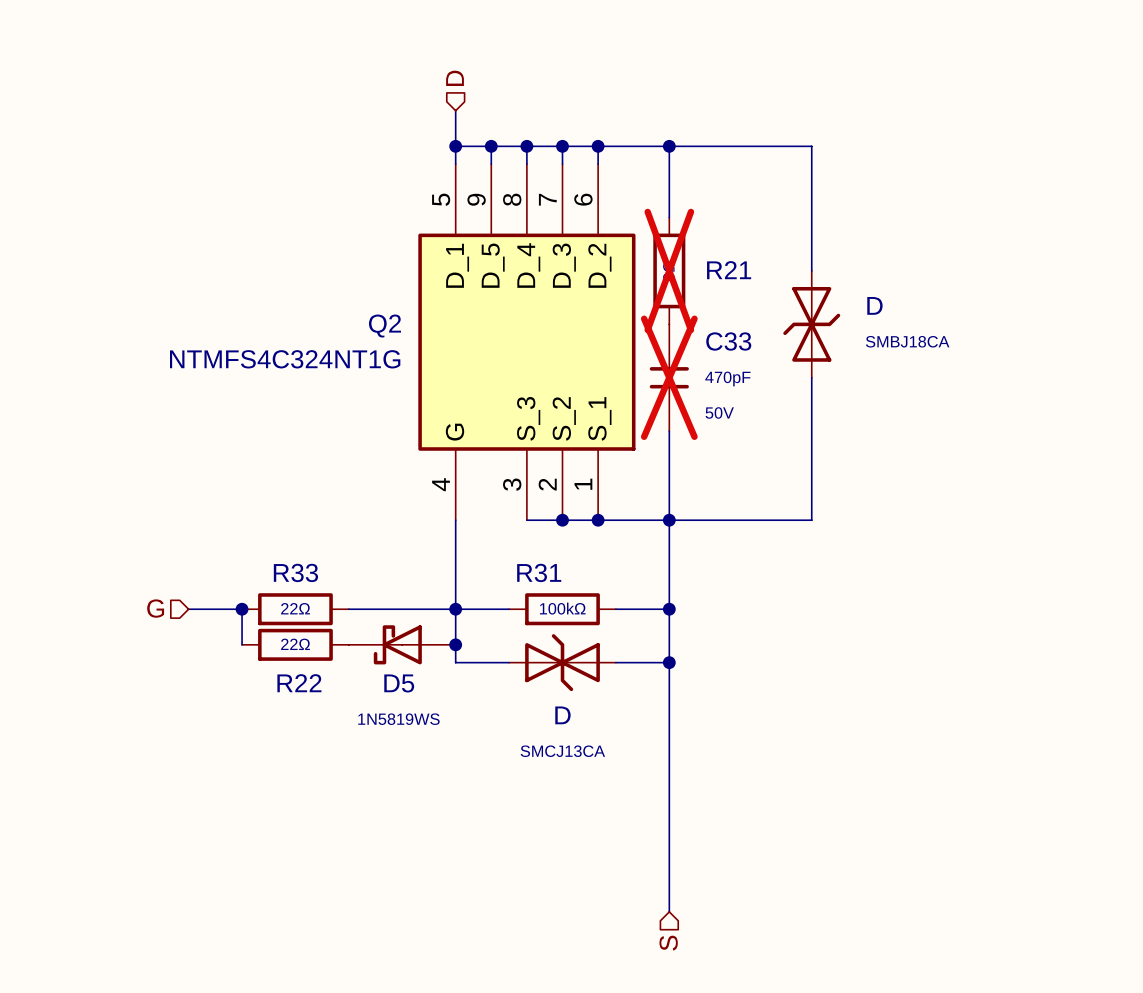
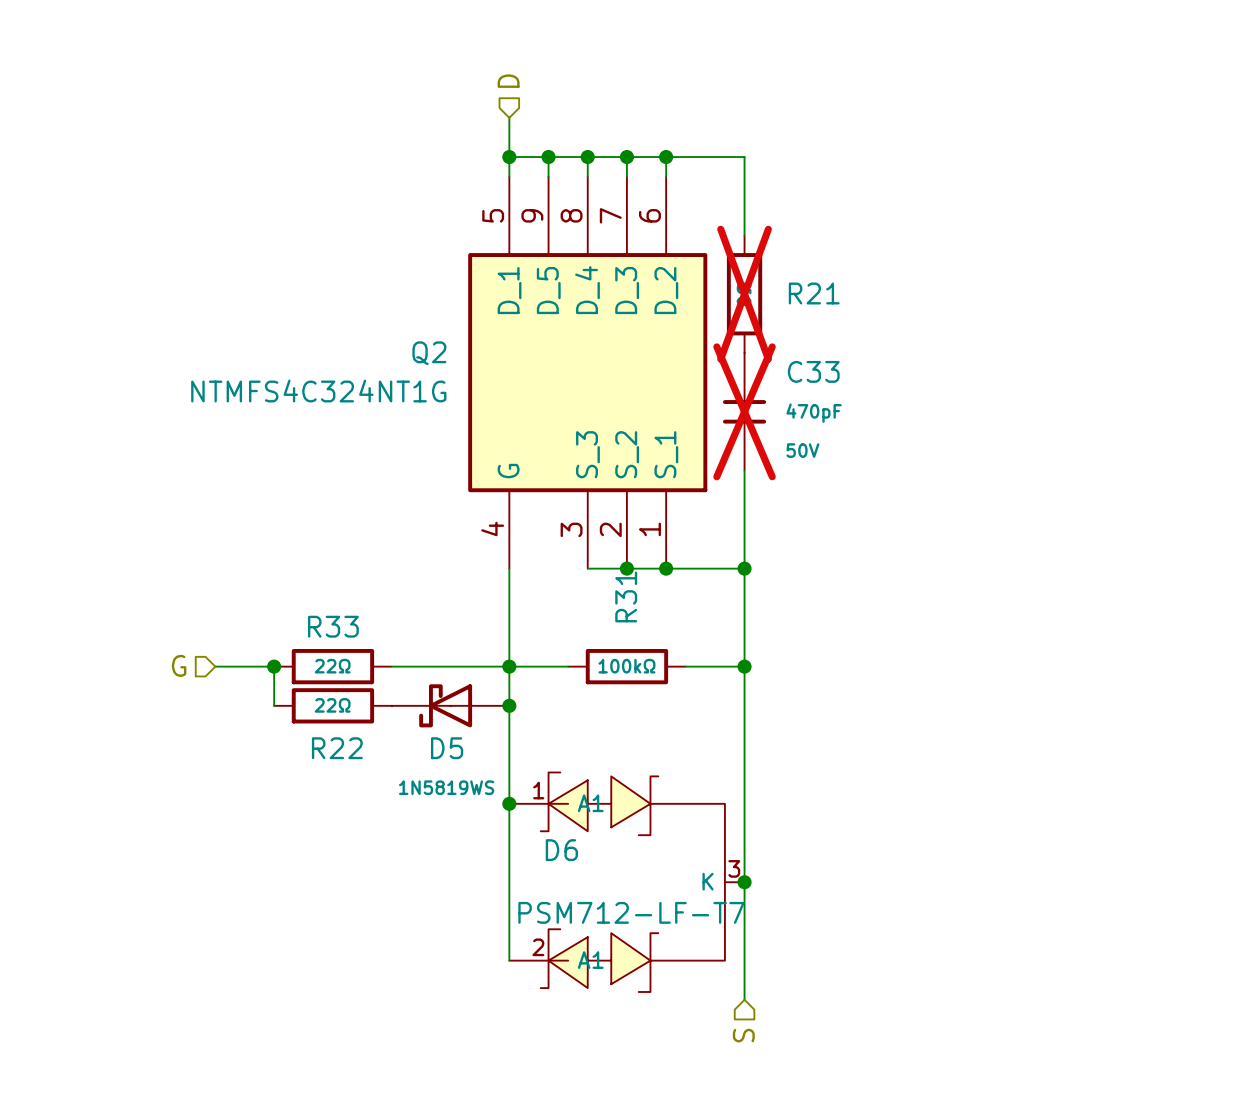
wire: (669, 146) (811, 146) (811, 270) -> none
junction: (669, 146) -> none
D: SMBJ18CA (811, 324) -> none
wire: (811, 377) (811, 520) (669, 520) -> none
R31 name rotation: 0° (539, 572) -> 90° counterclockwise (626, 596)
wire: (455, 662) (509, 662) -> (509, 725) (509, 960)
D: SMCJ13CA (562, 662) -> none
wire: (615, 662) (669, 662) -> none
junction: (669, 662) -> none
junction: none -> (509, 803)
D6: none -> PSM712-LF-T7 (626, 882)
junction: none -> (744, 882)

